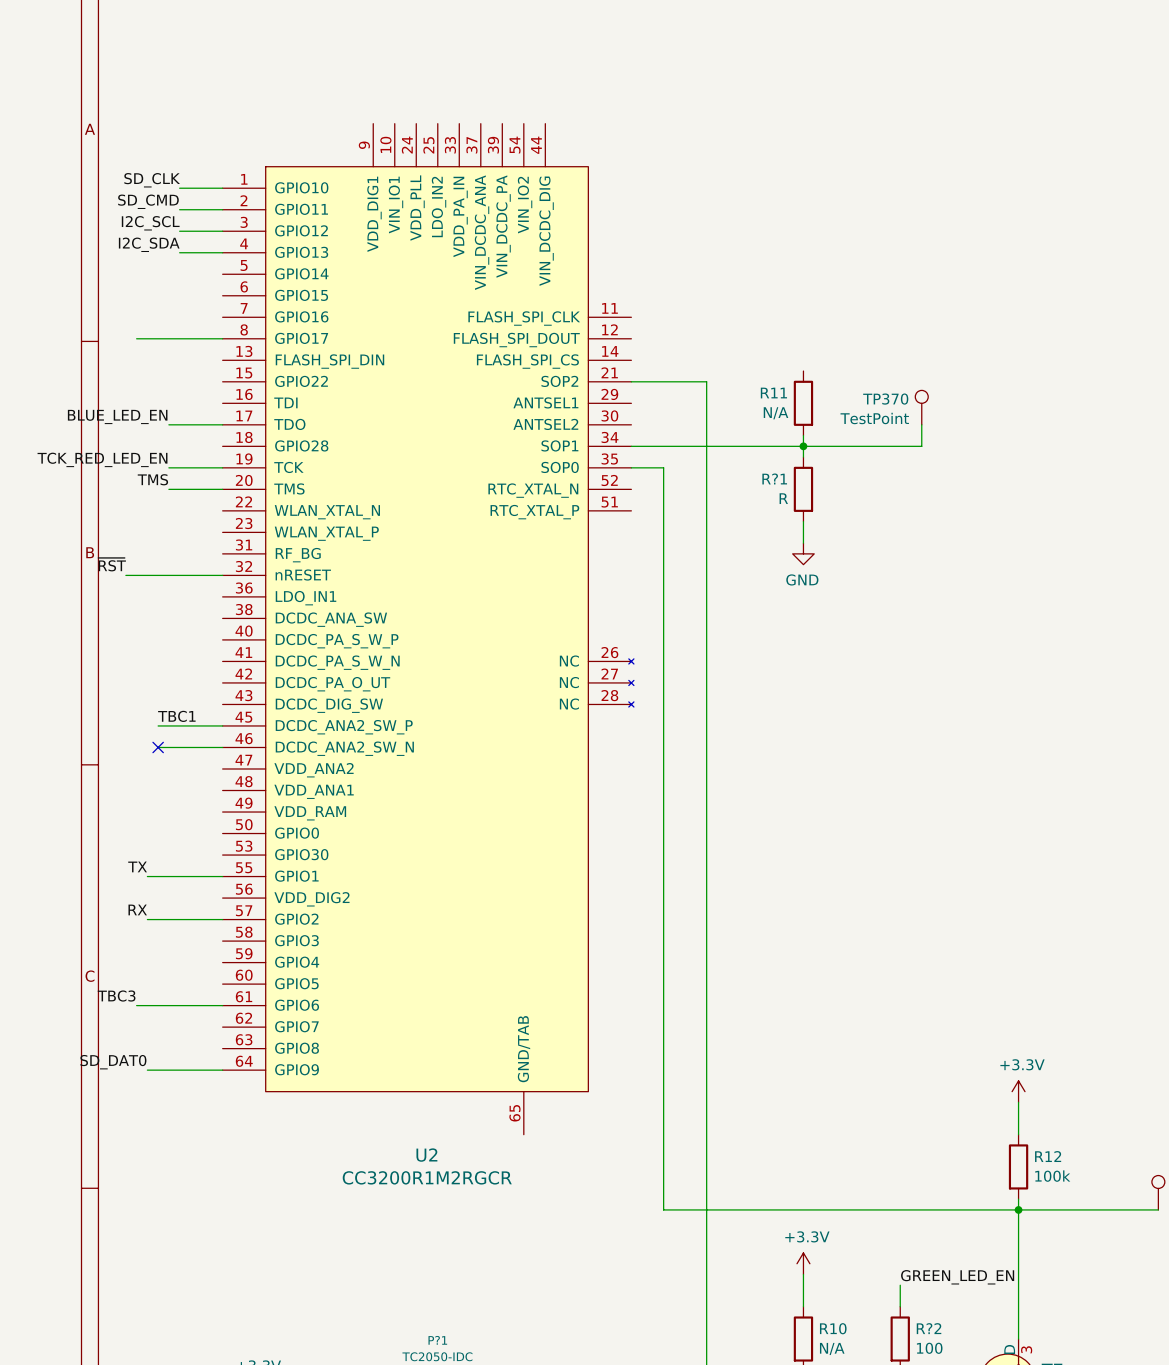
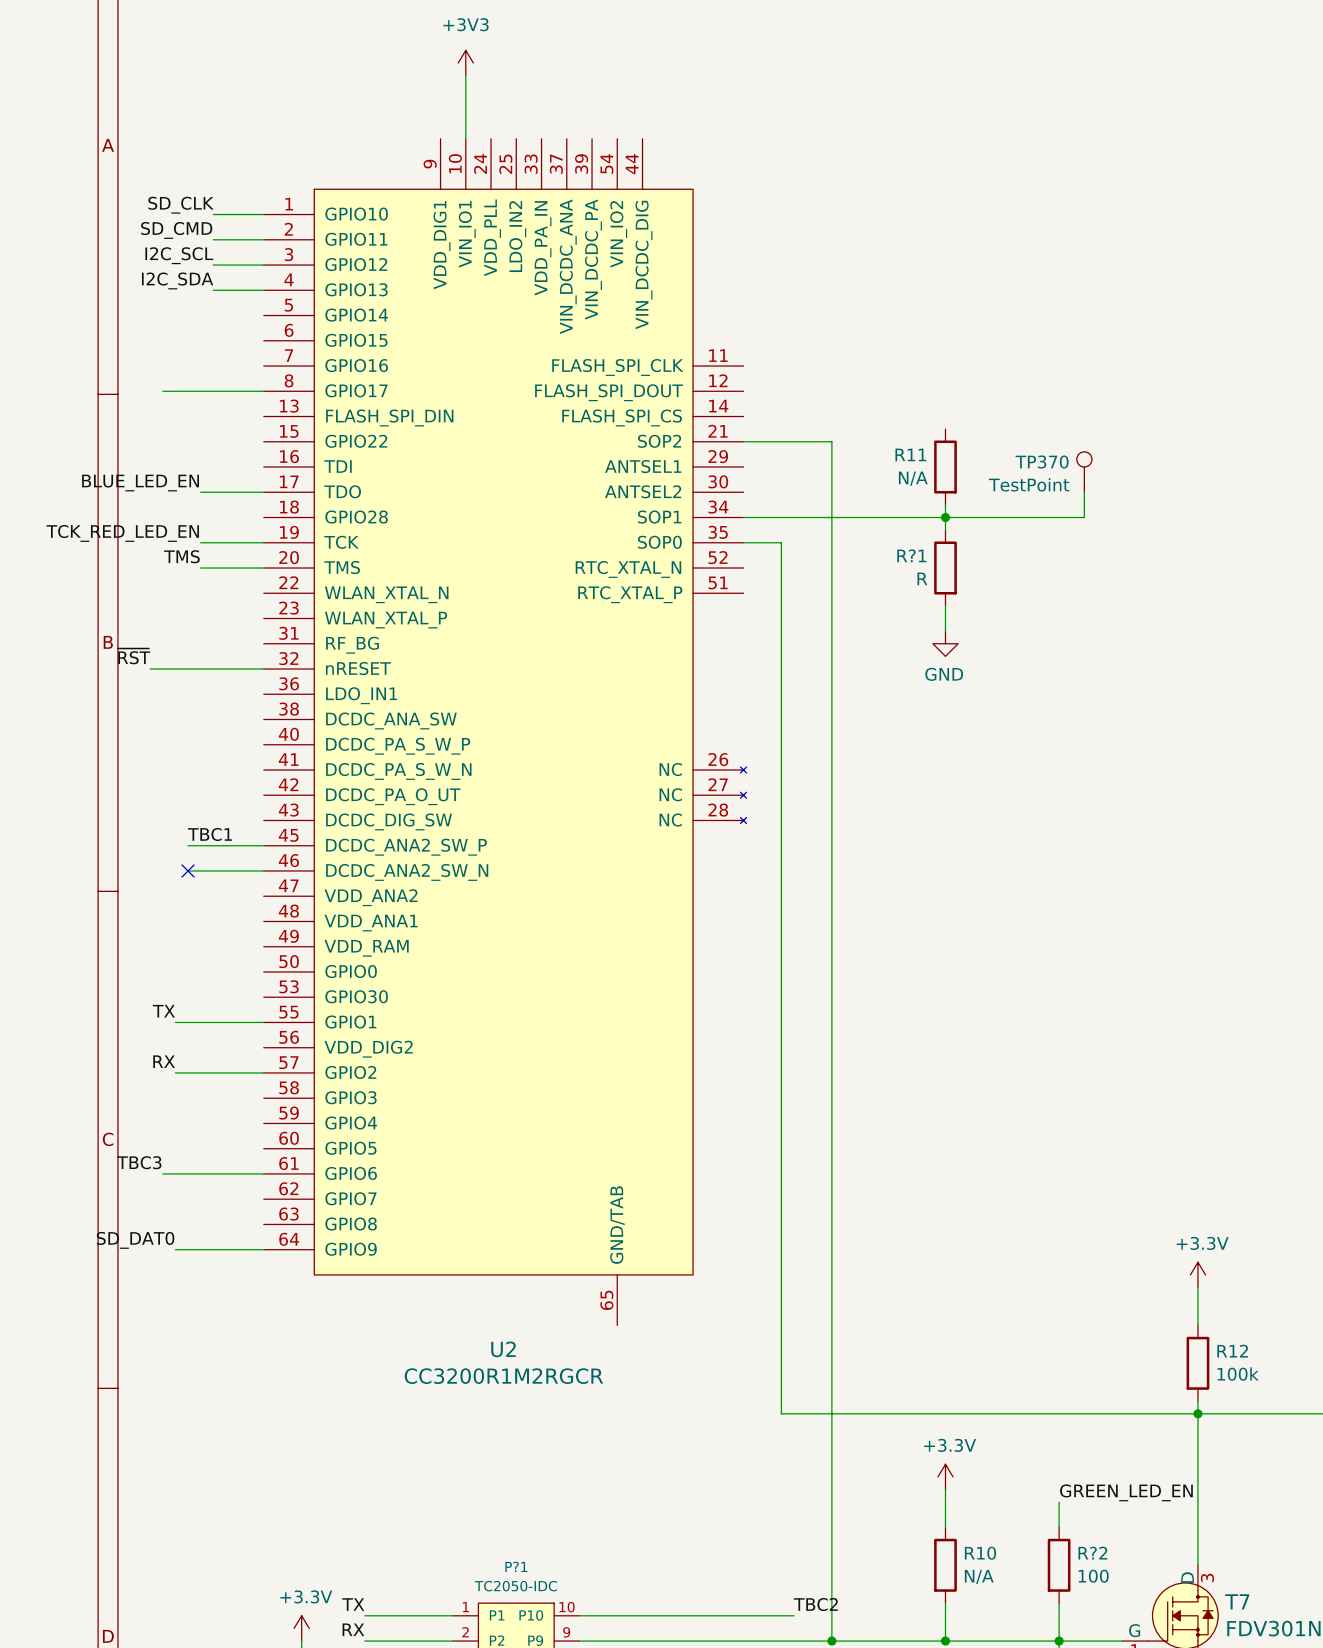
power symbol: none -> +3V3 (465, 63)
wire: none -> (465, 75) (465, 138)

